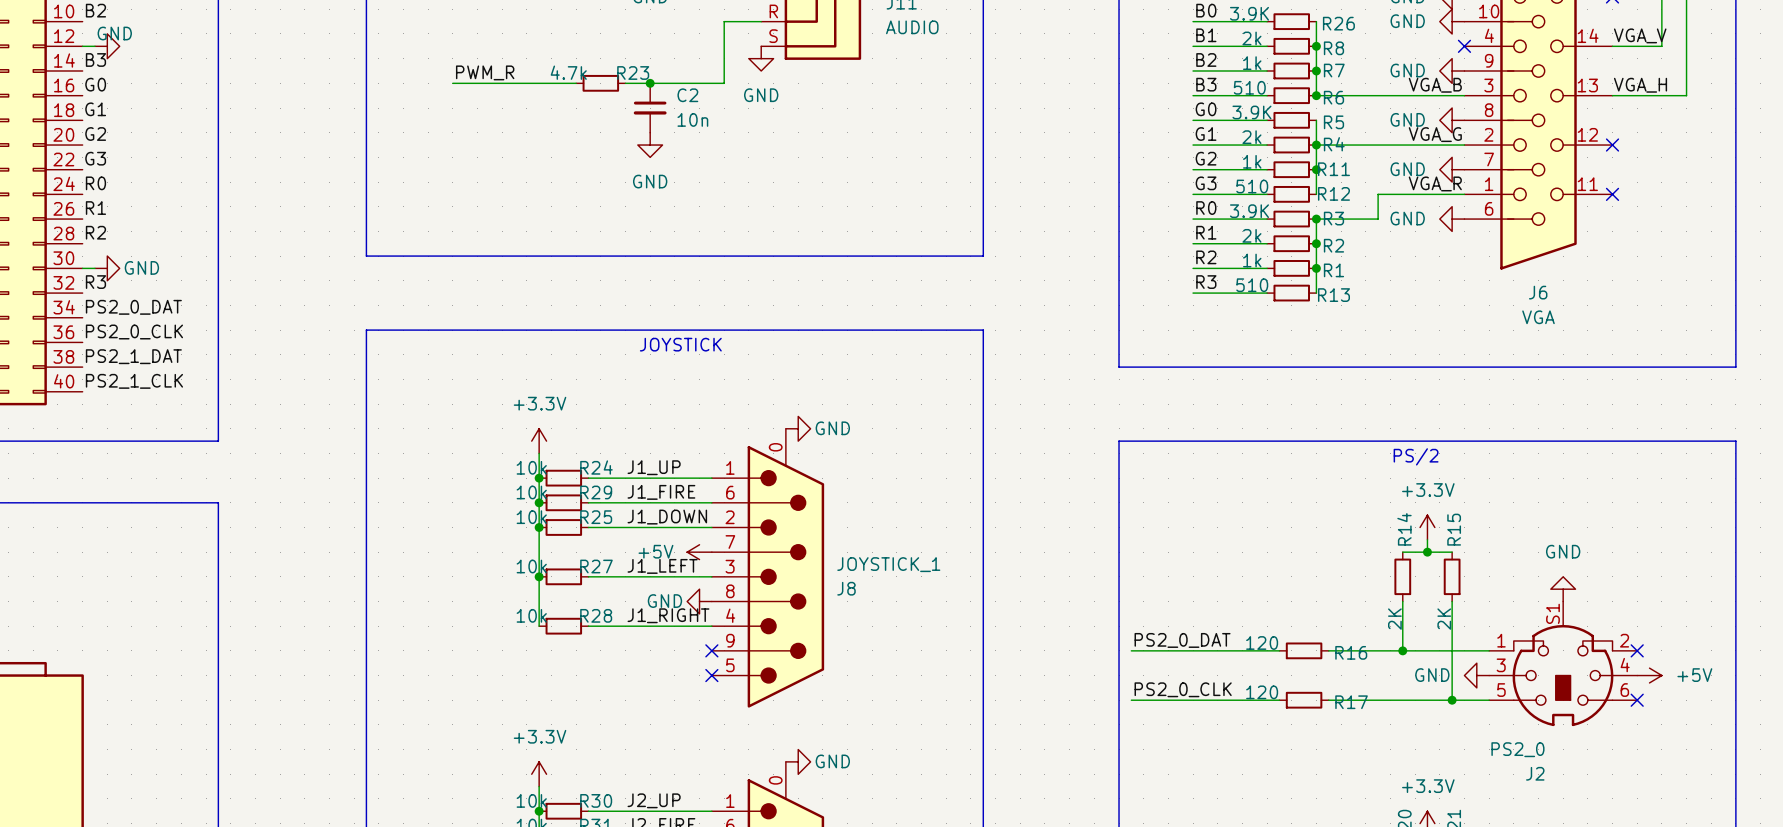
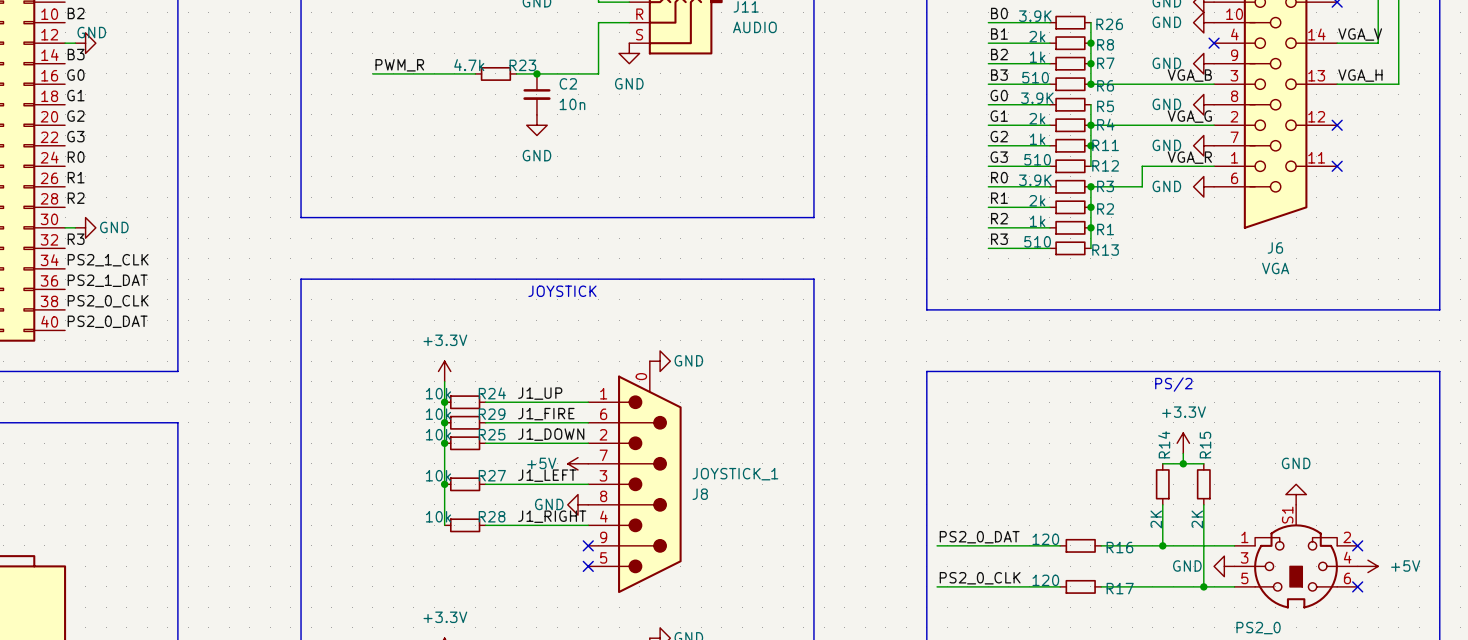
label: PS2_0_DAT (133, 307) -> PS2_1_CLK (108, 260)
label: PS2_0_CLK (134, 332) -> PS2_1_DAT (107, 280)
label: PS2_1_DAT (133, 356) -> PS2_0_CLK (108, 301)
label: PS2_1_CLK (134, 381) -> PS2_0_DAT (107, 321)

